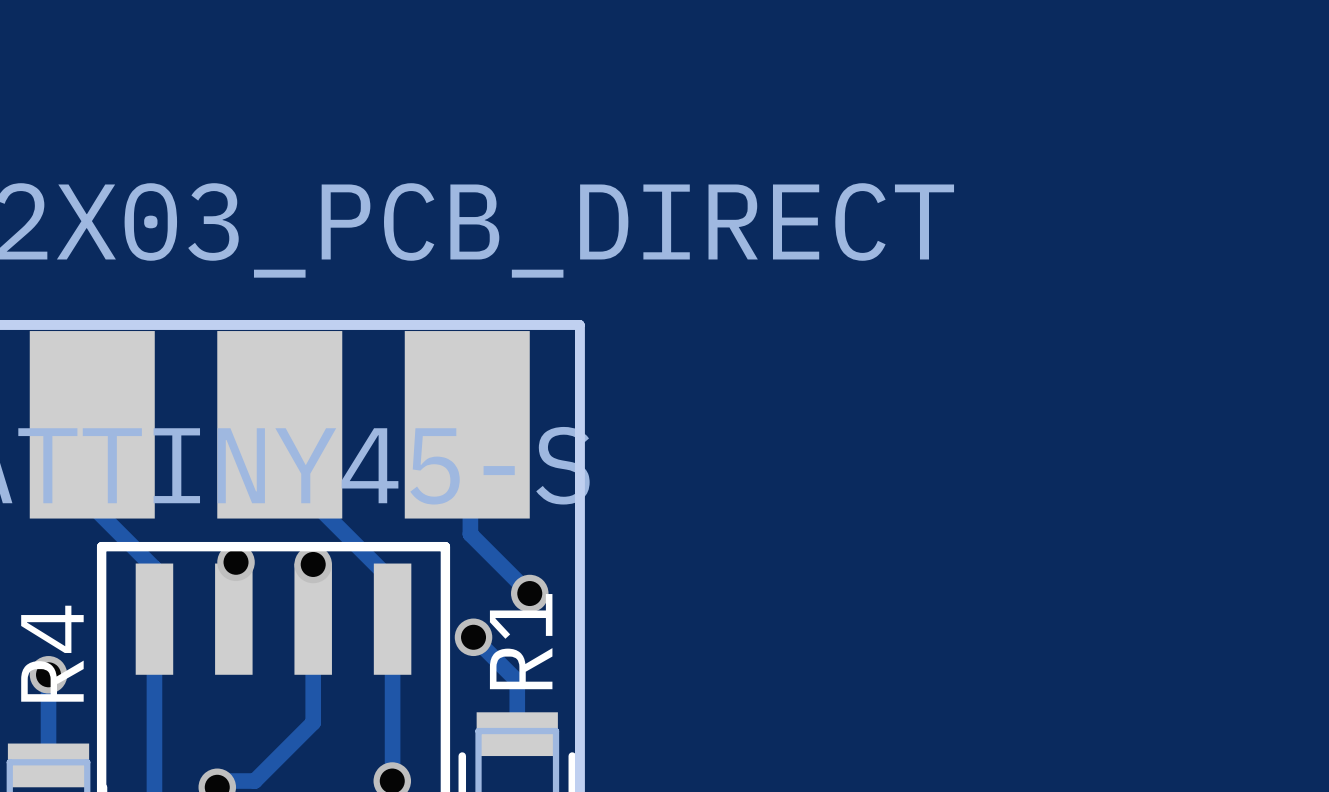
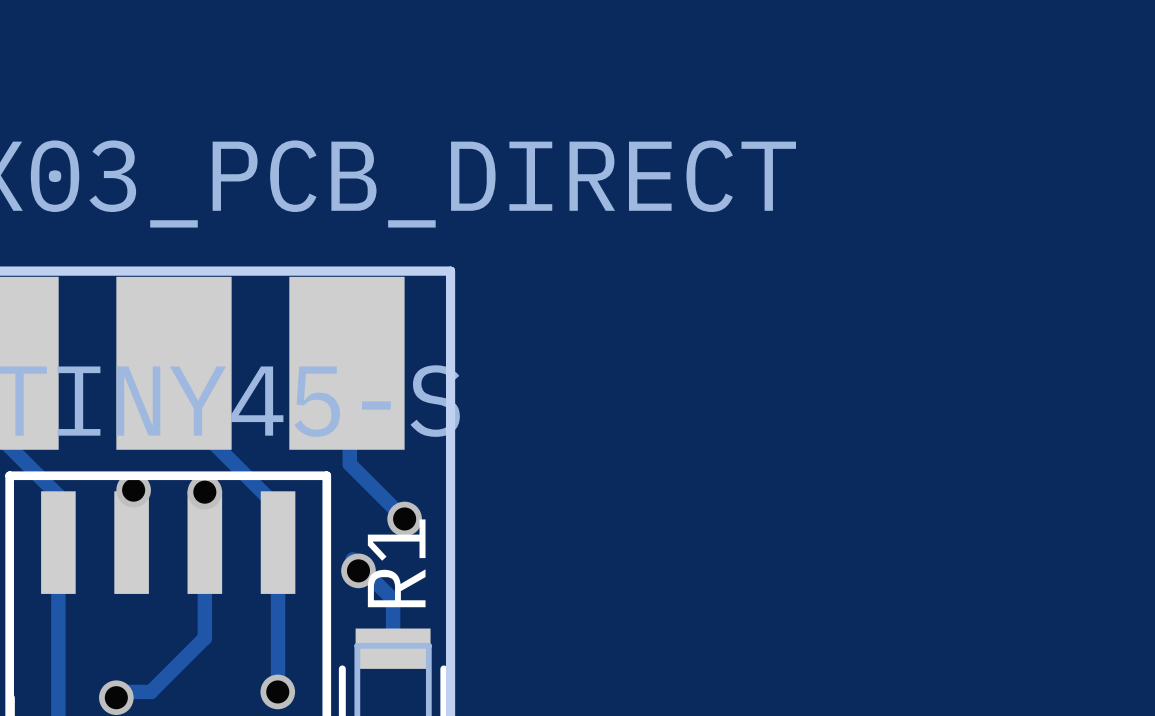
via position: (473, 637) -> (358, 570)

